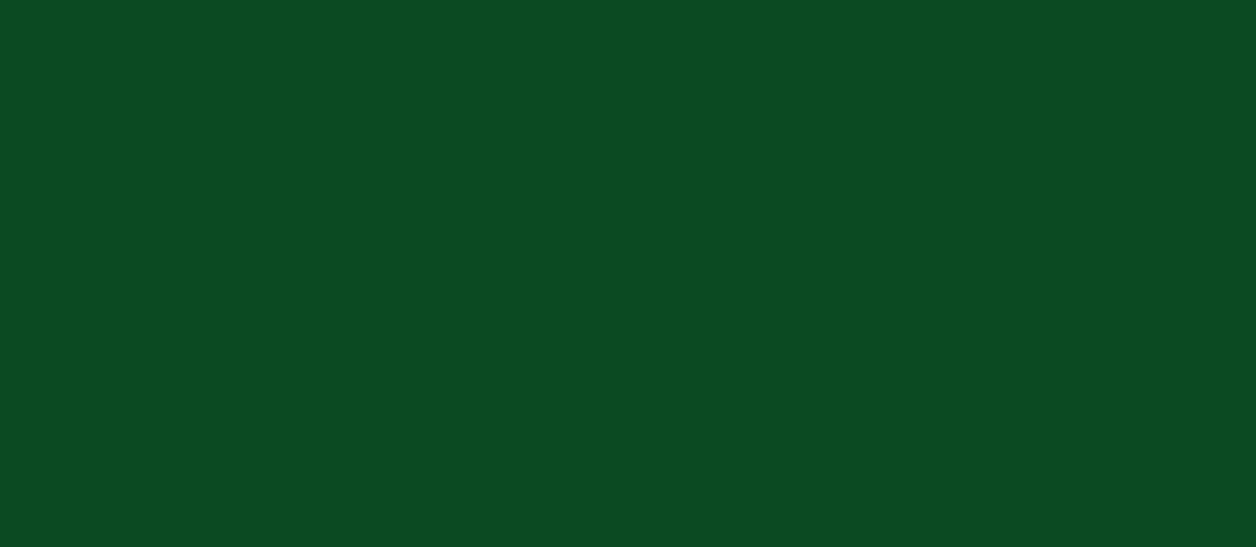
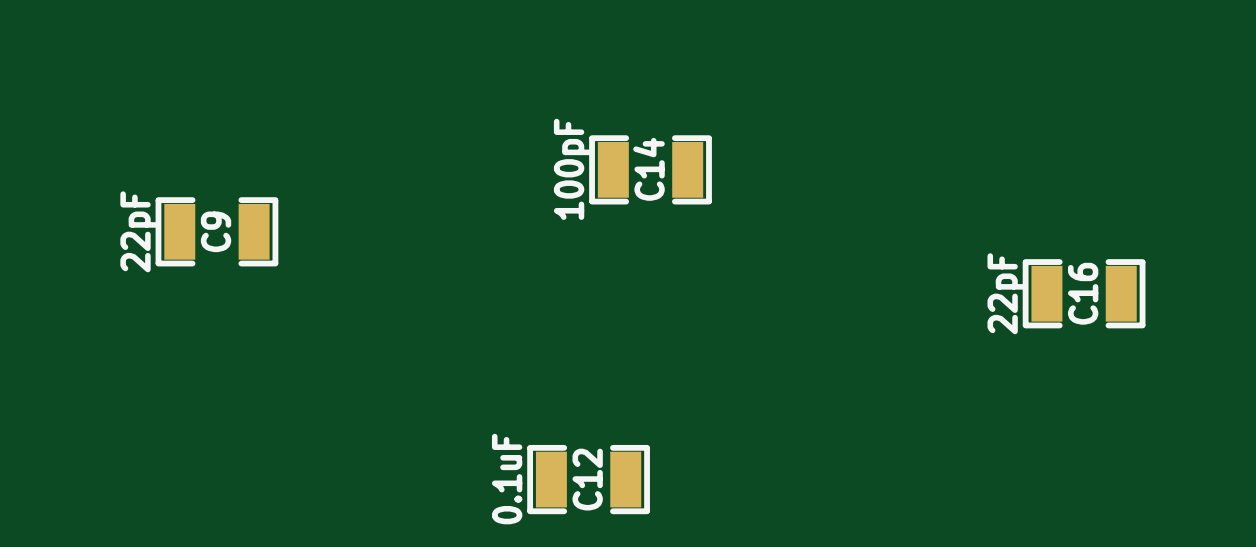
C14: none -> 100pF (650, 169)
C9: none -> 22pF (216, 231)
C16: none -> 22pF (1084, 293)
C12: none -> 0.1uF (588, 479)

